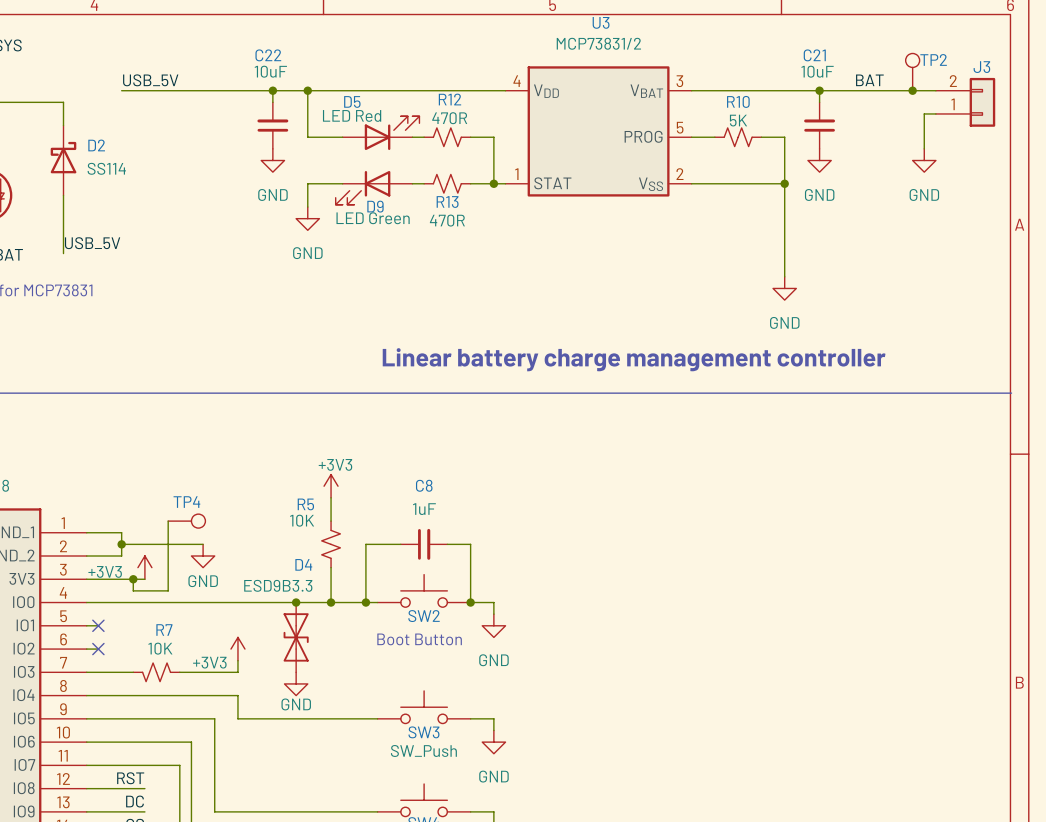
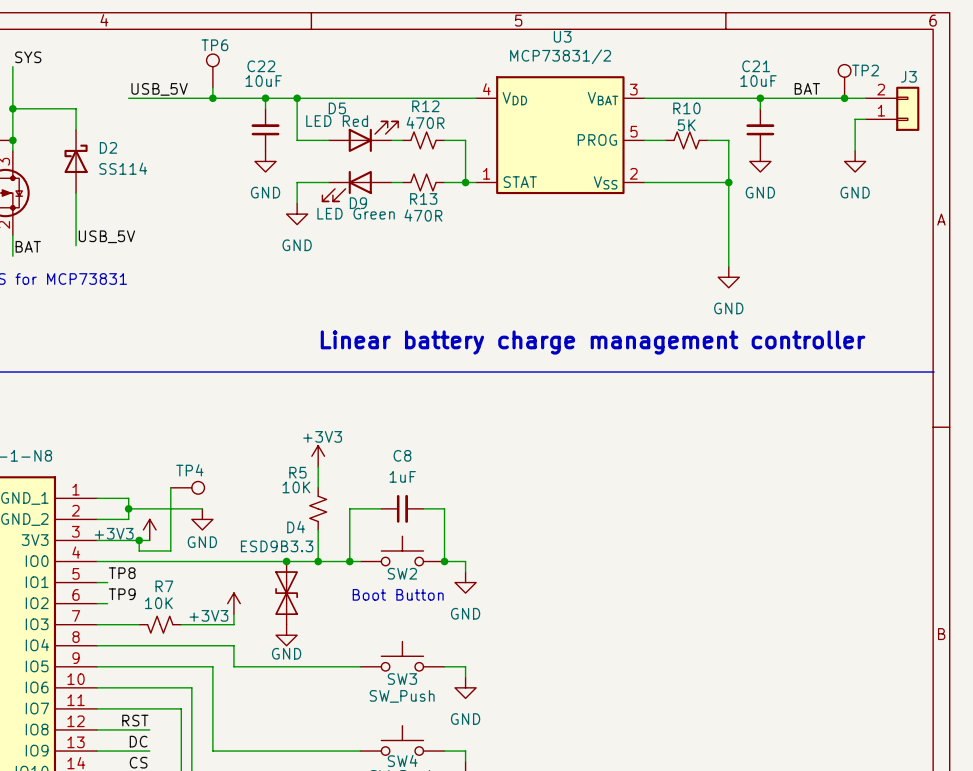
TP6: none -> (212, 70)
wire: none -> (212, 87) (212, 98)
junction: none -> (212, 98)
label: none -> TP8 (122, 573)
no-connect mark: (98, 625) -> none
label: none -> TP9 (122, 594)
no-connect mark: (98, 649) -> none

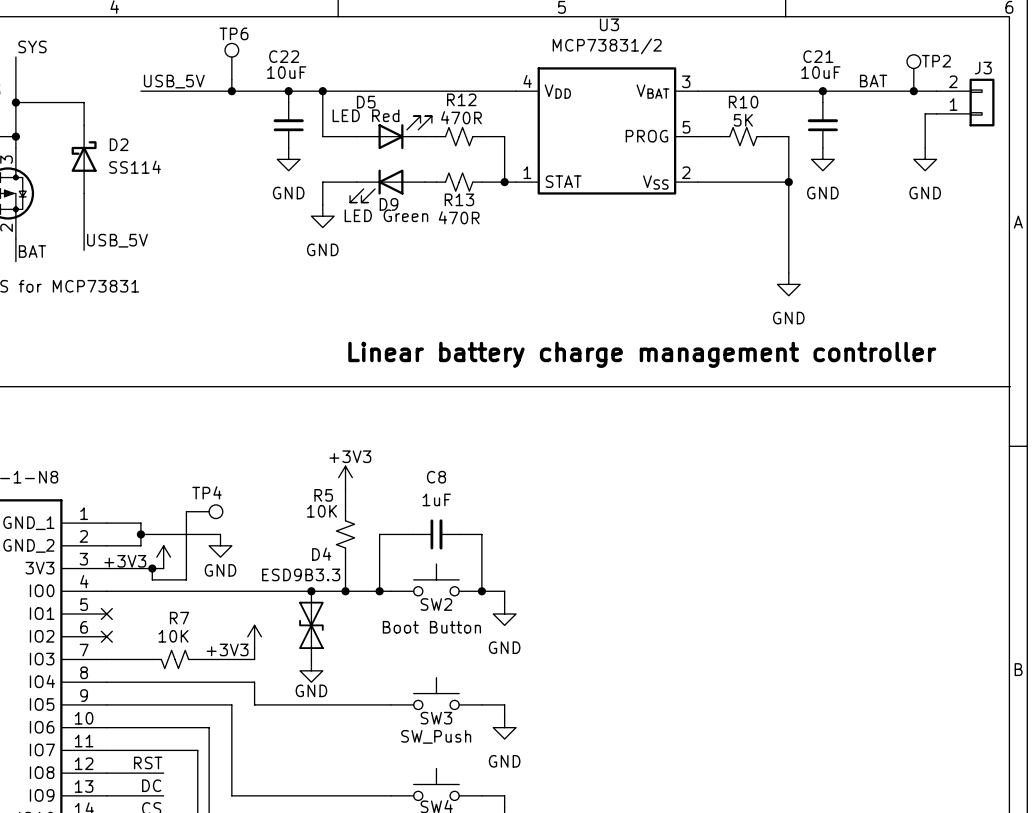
label: TP8 (122, 573) -> none
wire: (97, 582) (107, 582) -> none
no-connect mark: none -> (106, 614)
label: TP9 (122, 594) -> none
wire: (97, 603) (107, 603) -> none
no-connect mark: none -> (106, 636)

